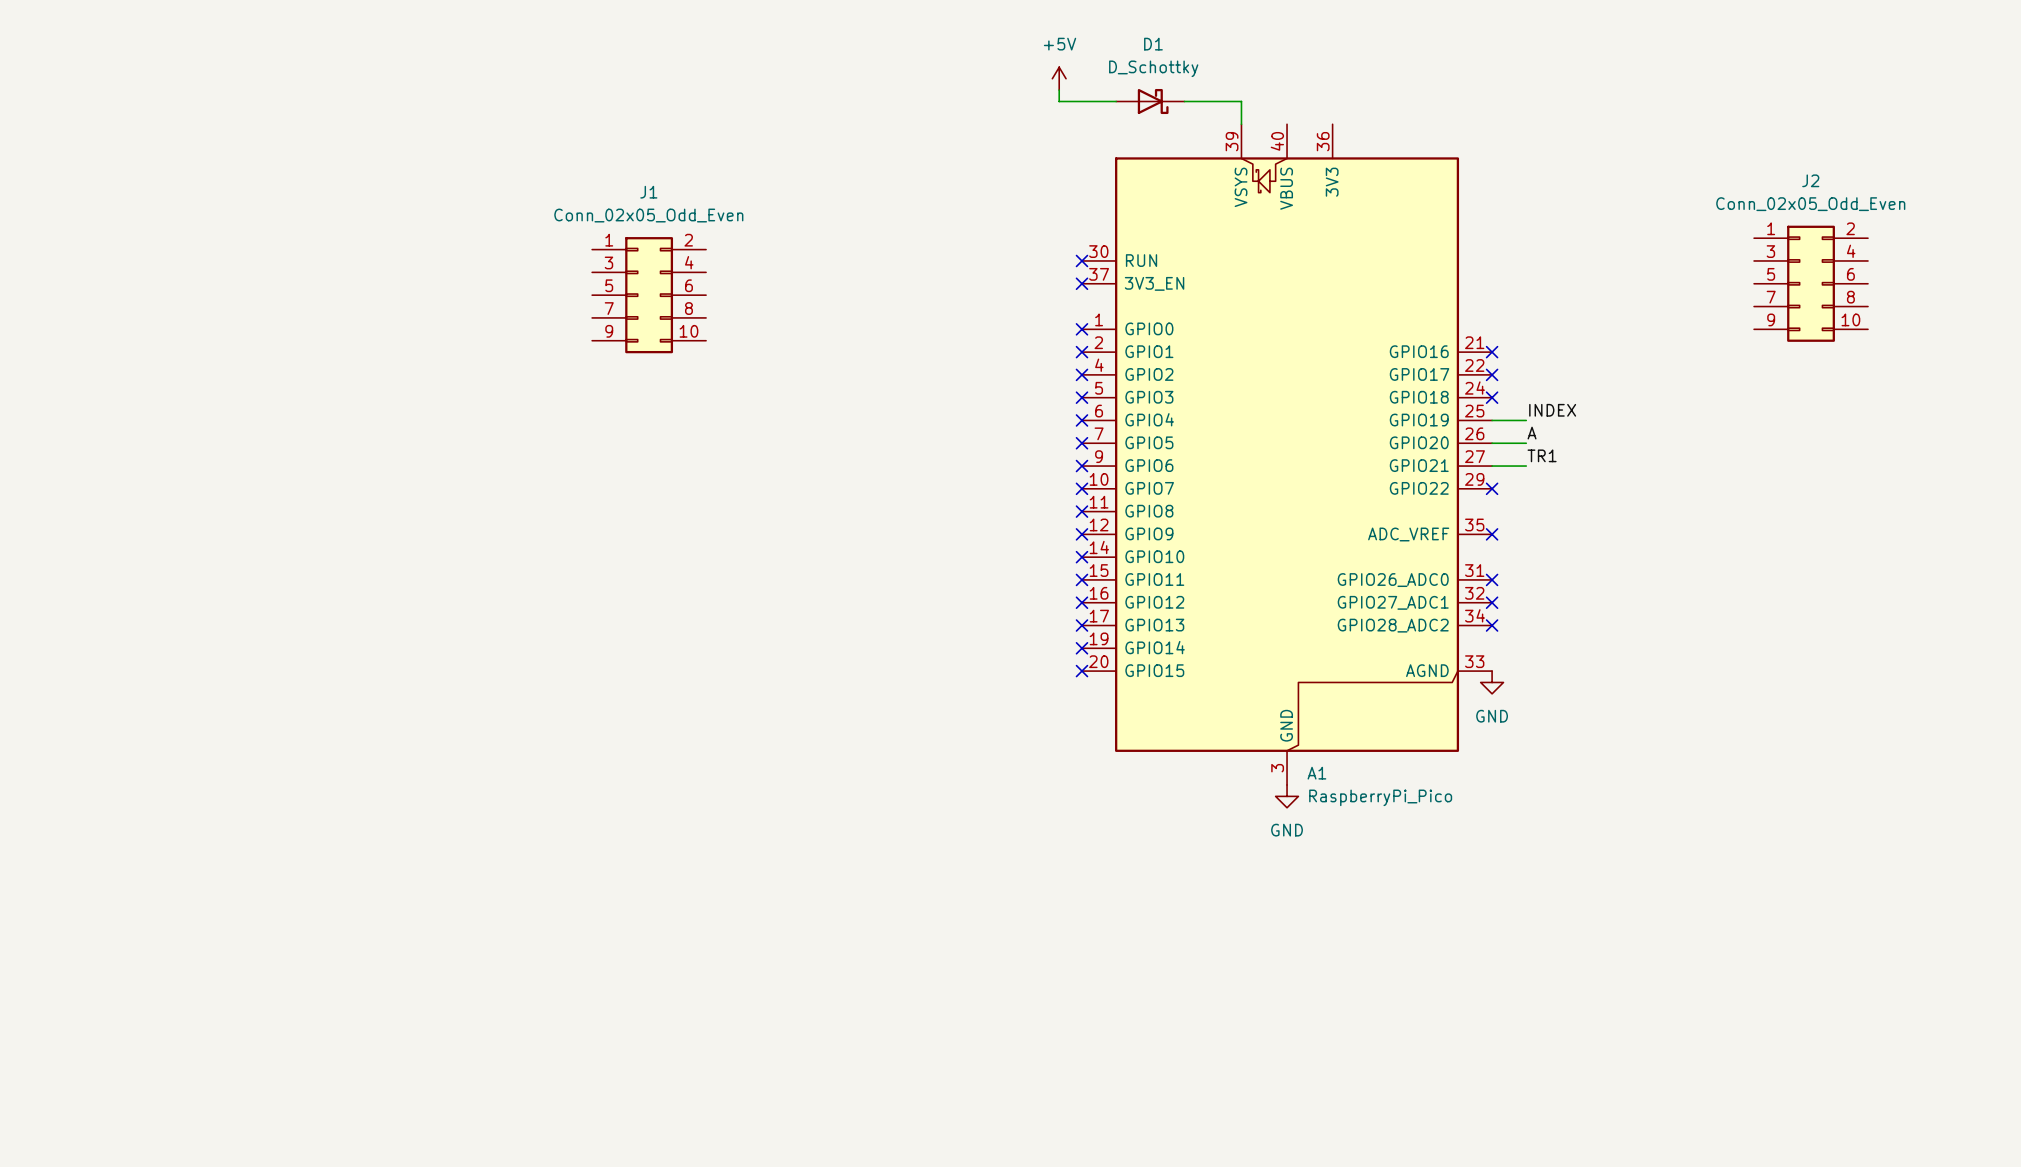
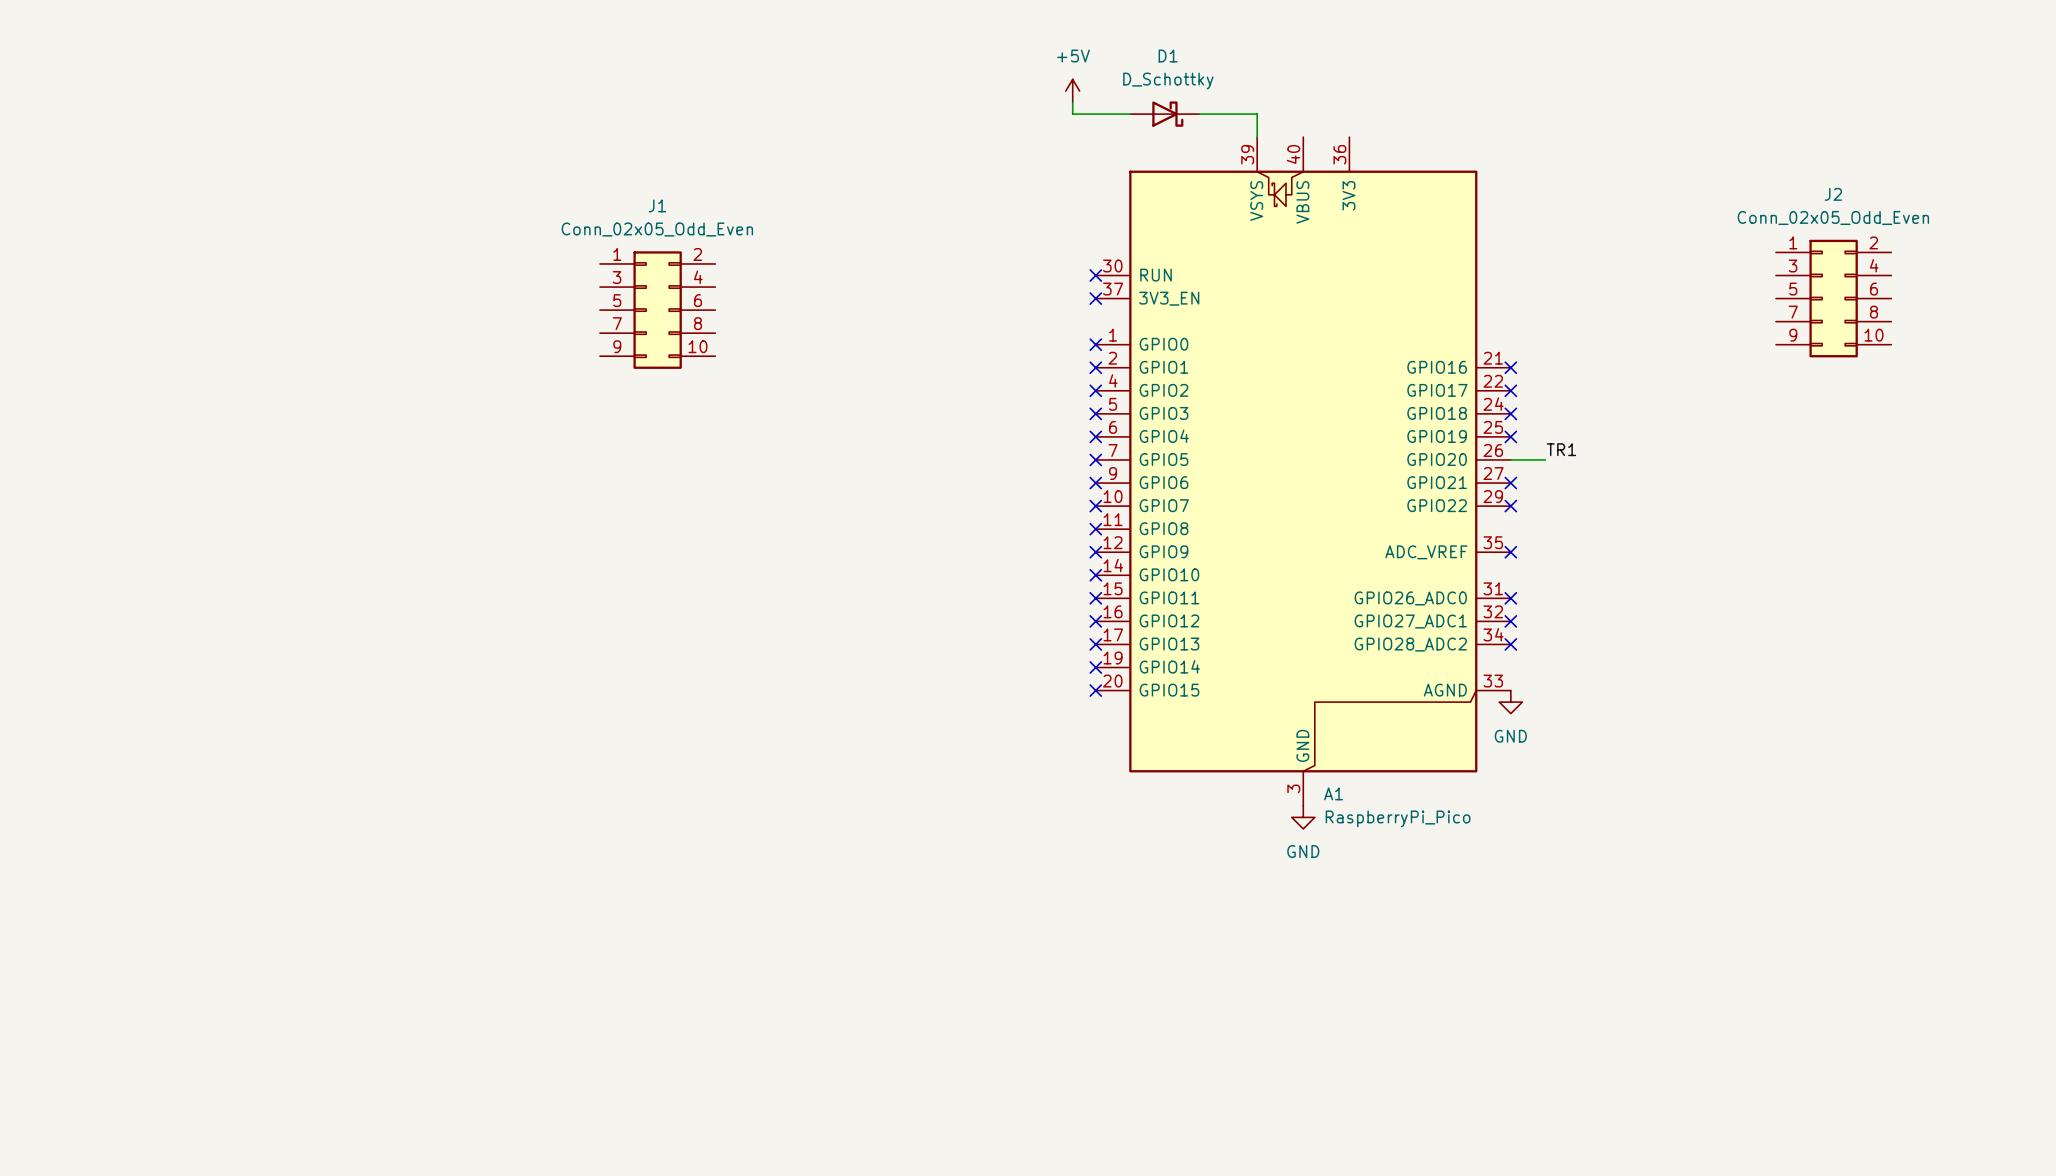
label: INDEX (1552, 410) -> none
wire: (1492, 420) (1526, 420) -> none
no-connect mark: none -> (1510, 436)
label: A (1532, 433) -> TR1 (1561, 449)
label: TR1 (1542, 455) -> none
wire: (1492, 466) (1526, 466) -> none
no-connect mark: none -> (1510, 483)

